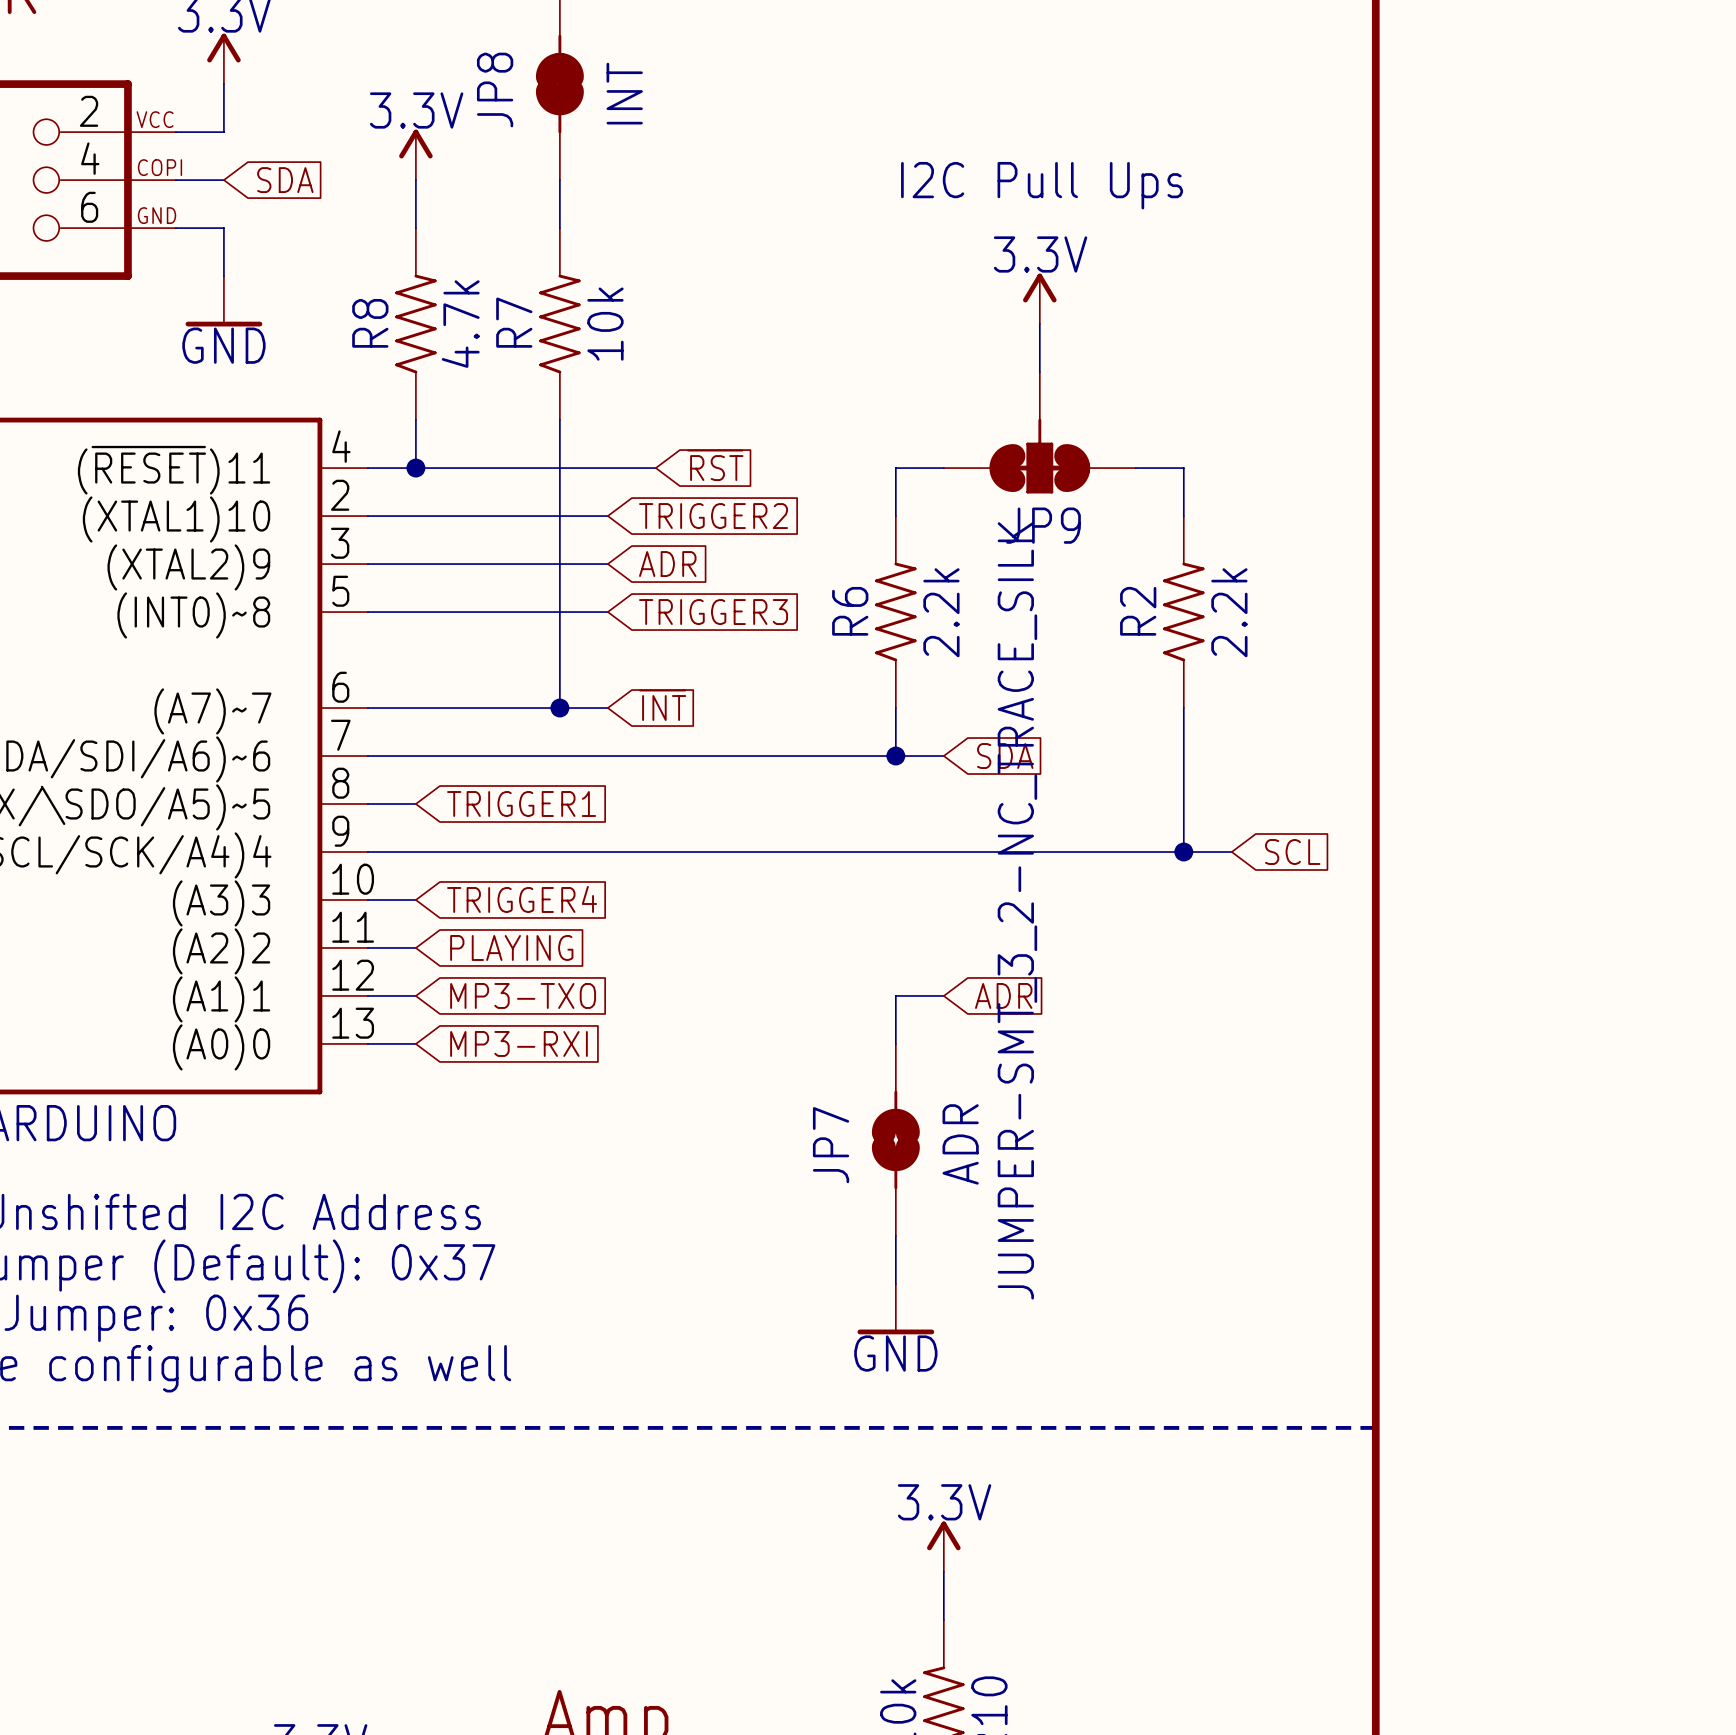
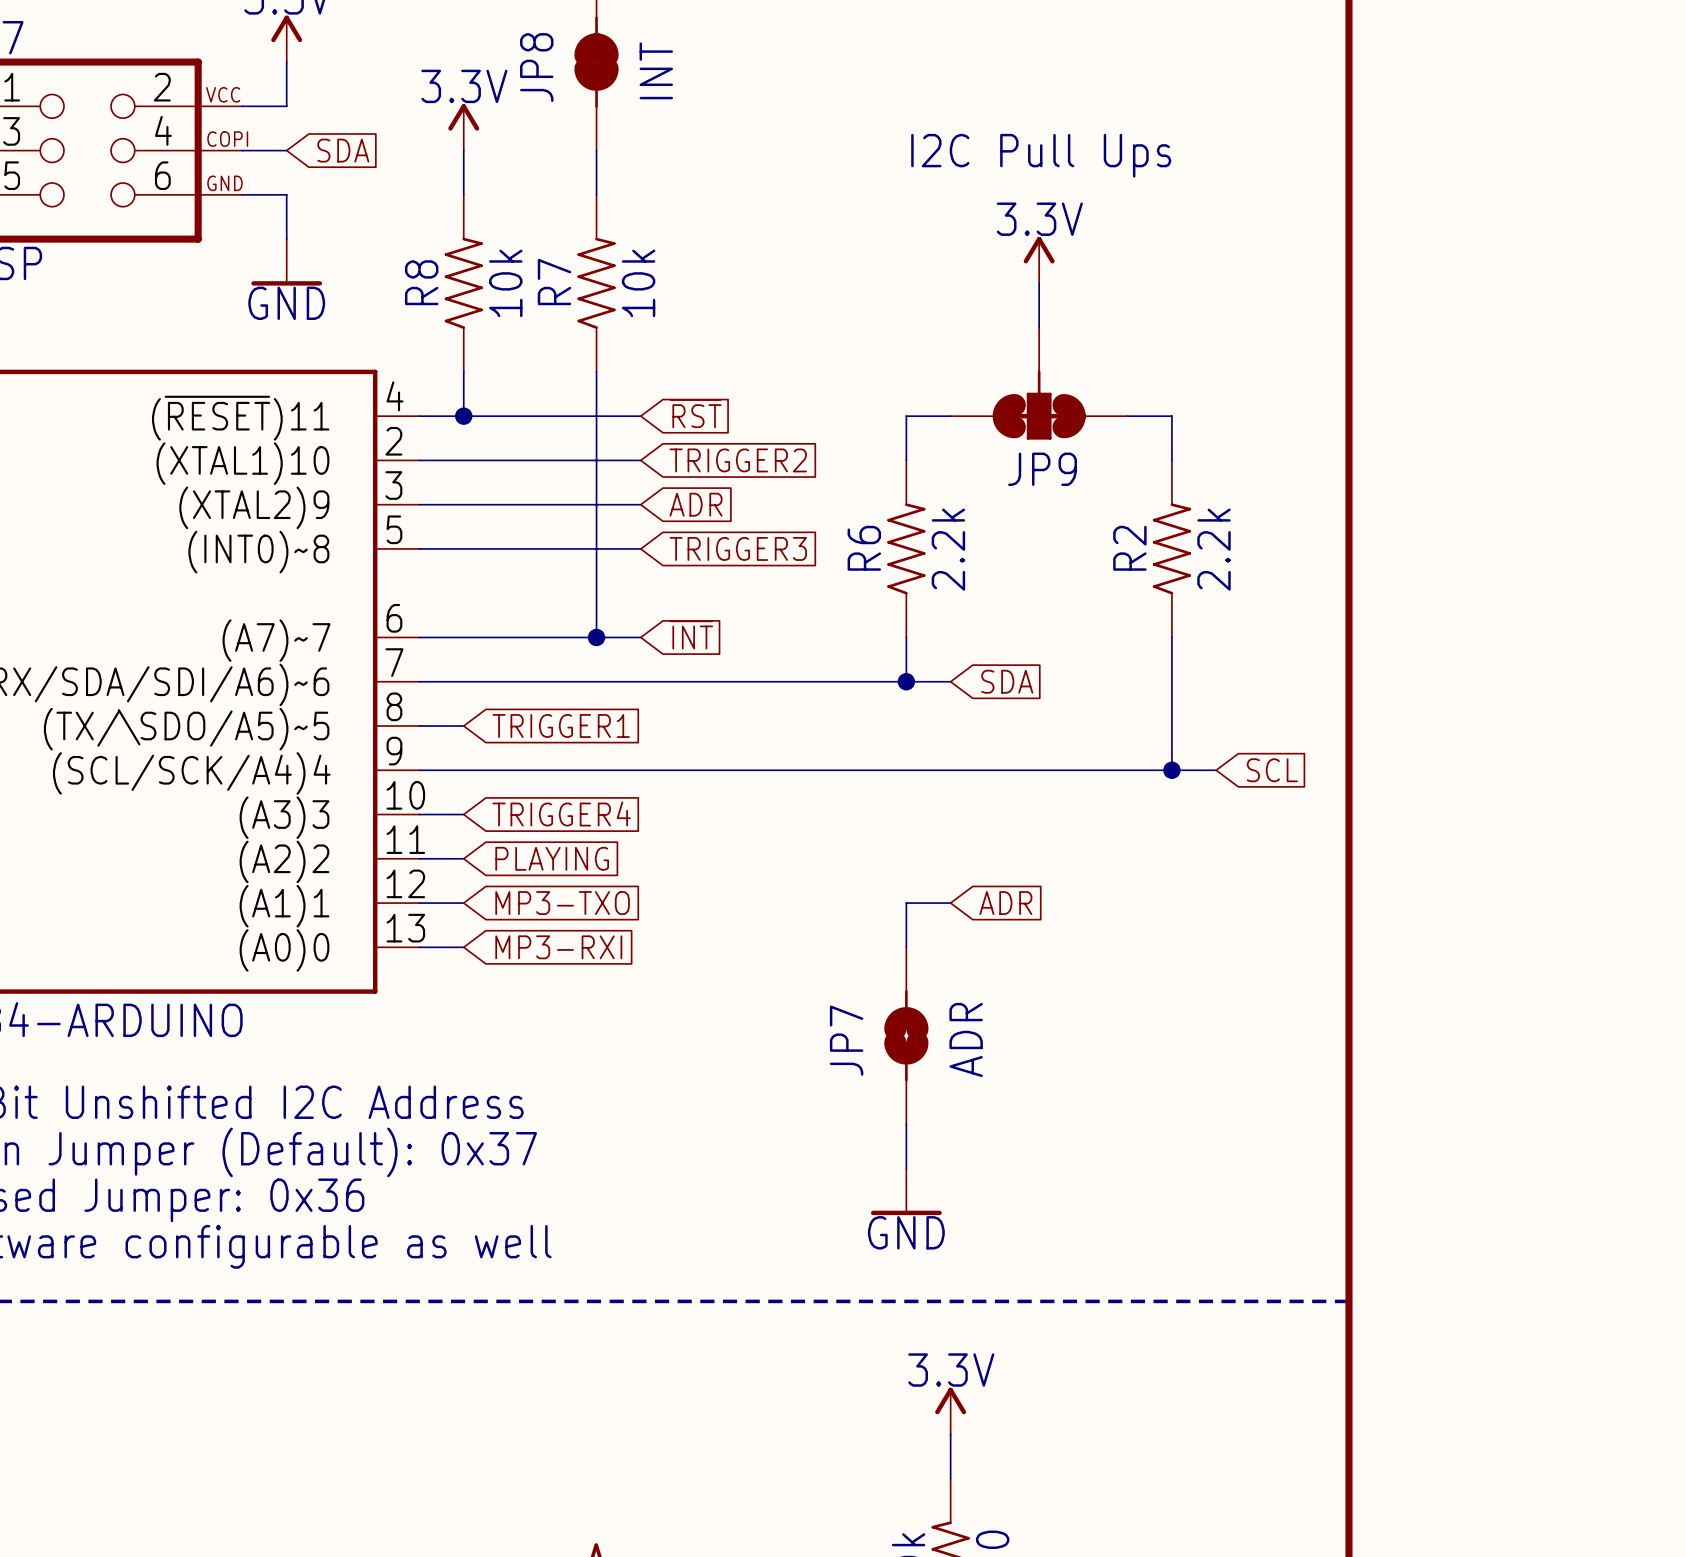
R8 value: 4.7k (460, 324) -> 10k (505, 283)
global label position: ~{RST} (715, 465) -> ~{RST} (695, 413)
wire: (607, 468) (655, 468) -> none
JP9 value: JUMPER-SMT_3_2-NC_TRACE_SILK (1017, 910) -> none

